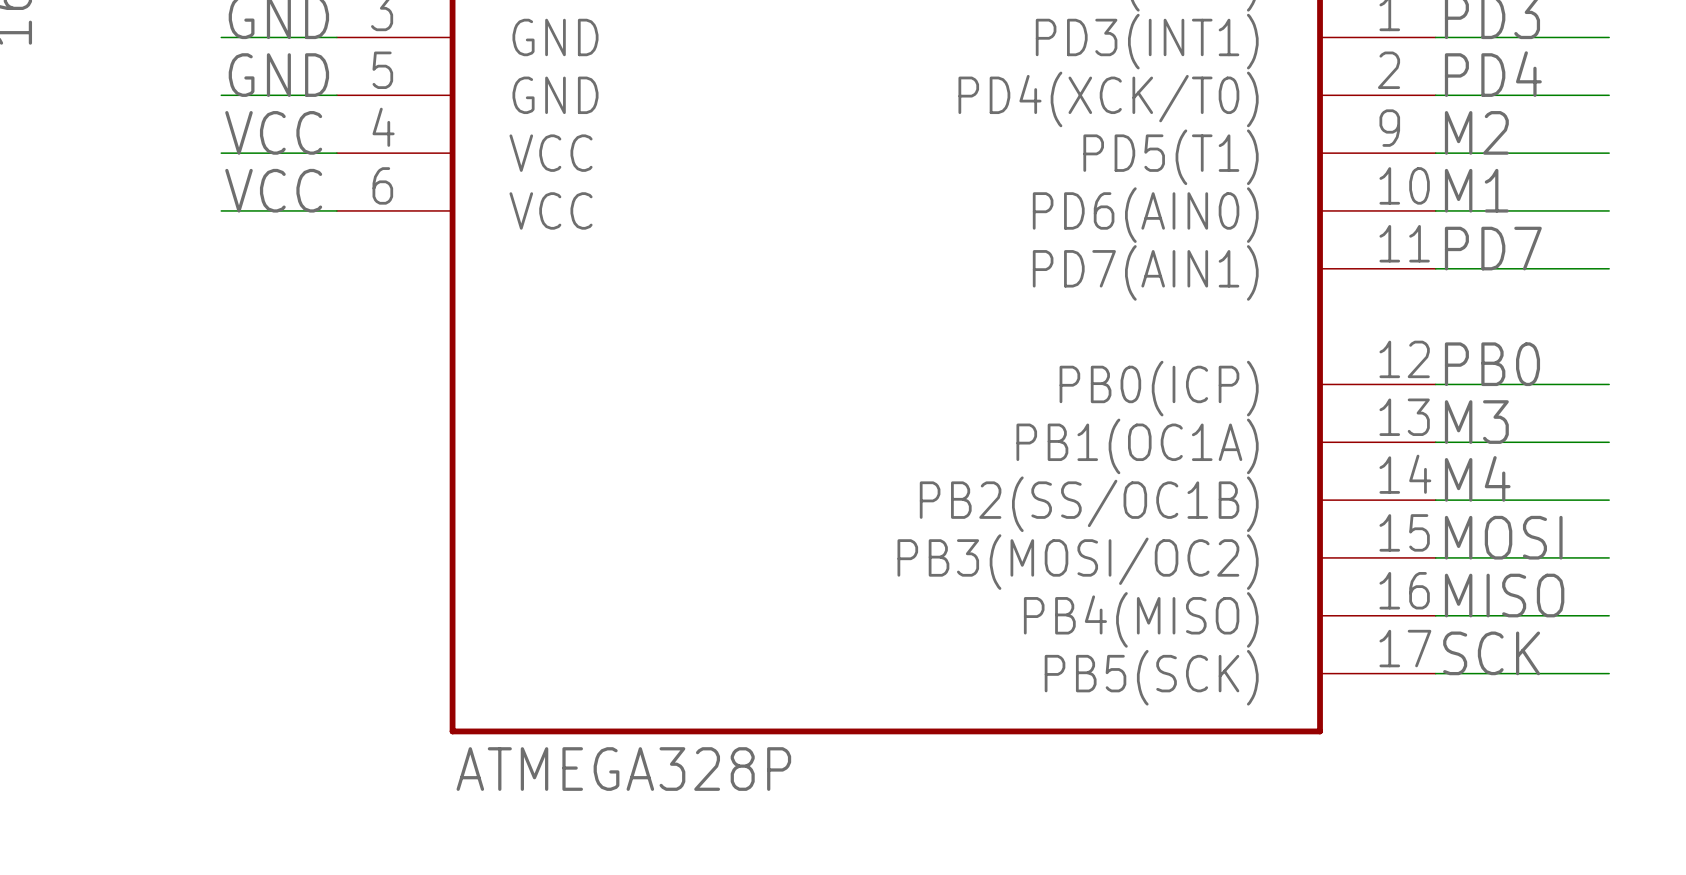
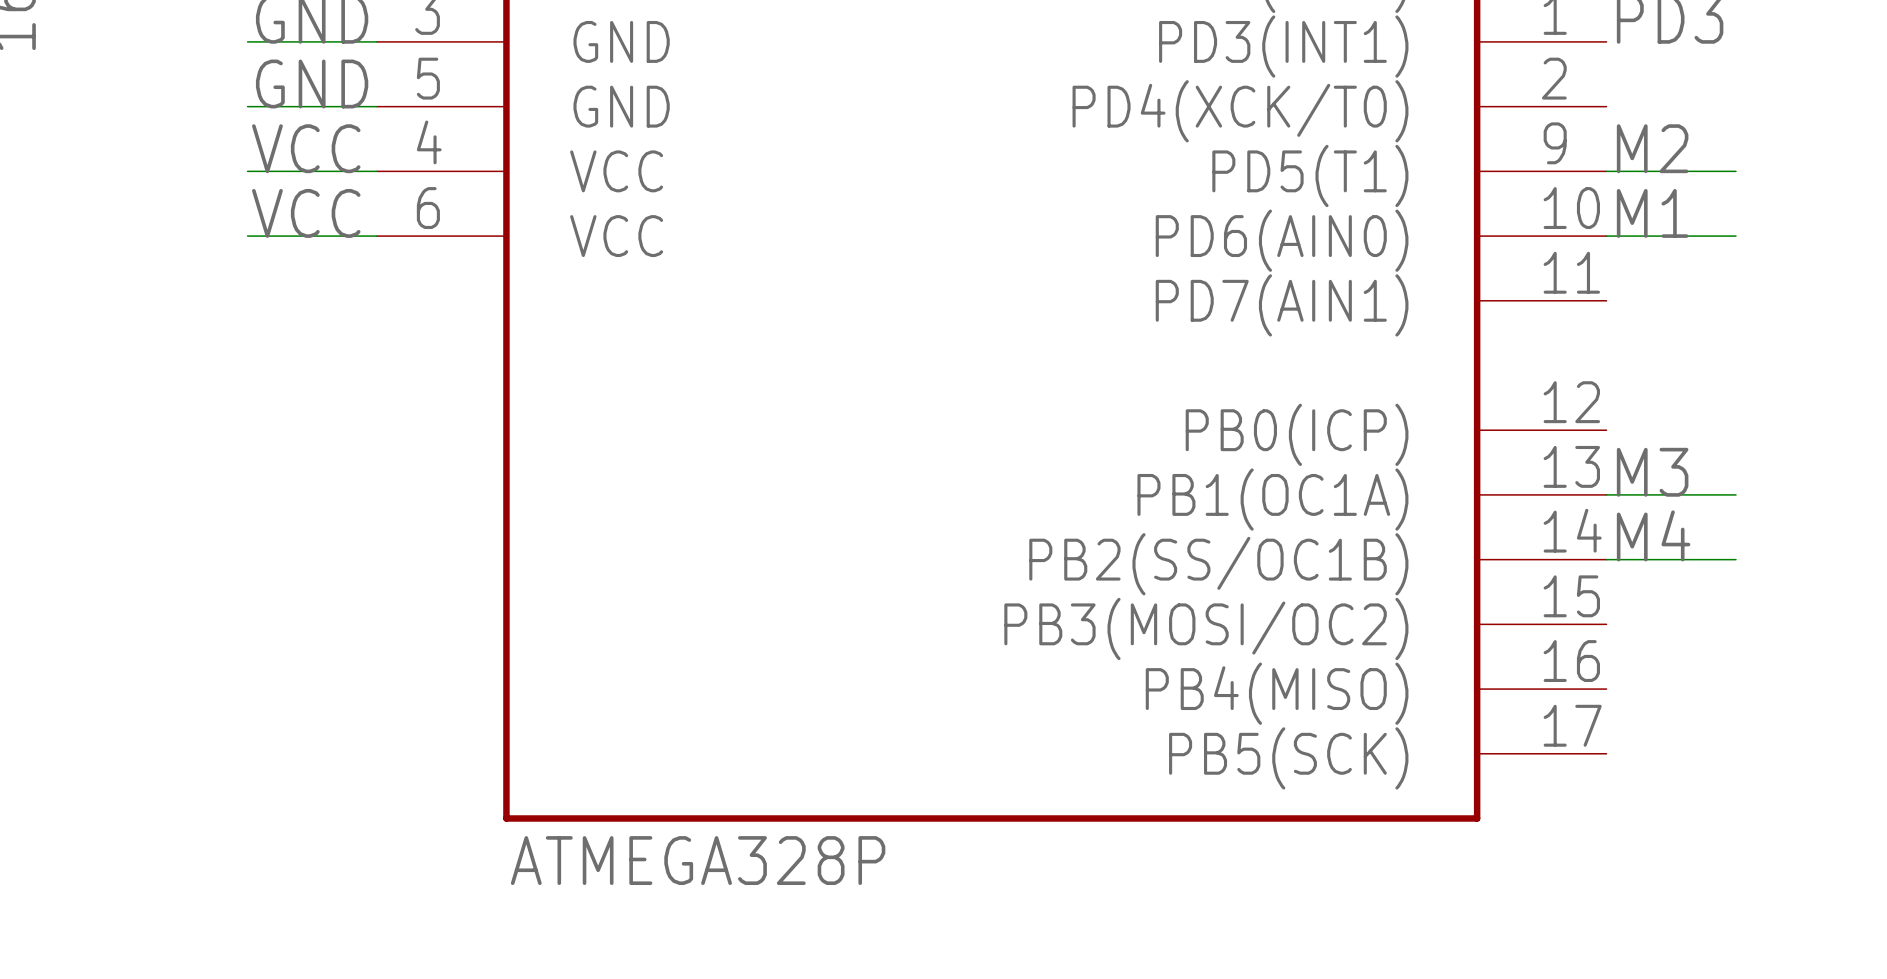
wire: (1435, 37) (1609, 37) -> none
label: PD4 (1493, 74) -> none
wire: (1435, 95) (1609, 95) -> none
wire: (1551, 153) (1609, 153) -> none
wire: (1551, 210) (1609, 210) -> none
label: PD7 (1493, 248) -> none
wire: (1435, 268) (1609, 268) -> none
label: PB0 (1492, 364) -> none
wire: (1435, 384) (1609, 384) -> none
wire: (1551, 442) (1609, 442) -> none
wire: (1551, 500) (1609, 500) -> none
label: MOSI (1503, 537) -> none
wire: (1435, 557) (1609, 557) -> none
label: MISO (1504, 595) -> none
wire: (1435, 615) (1609, 615) -> none
label: SCK (1491, 653) -> none
wire: (1435, 673) (1609, 673) -> none

